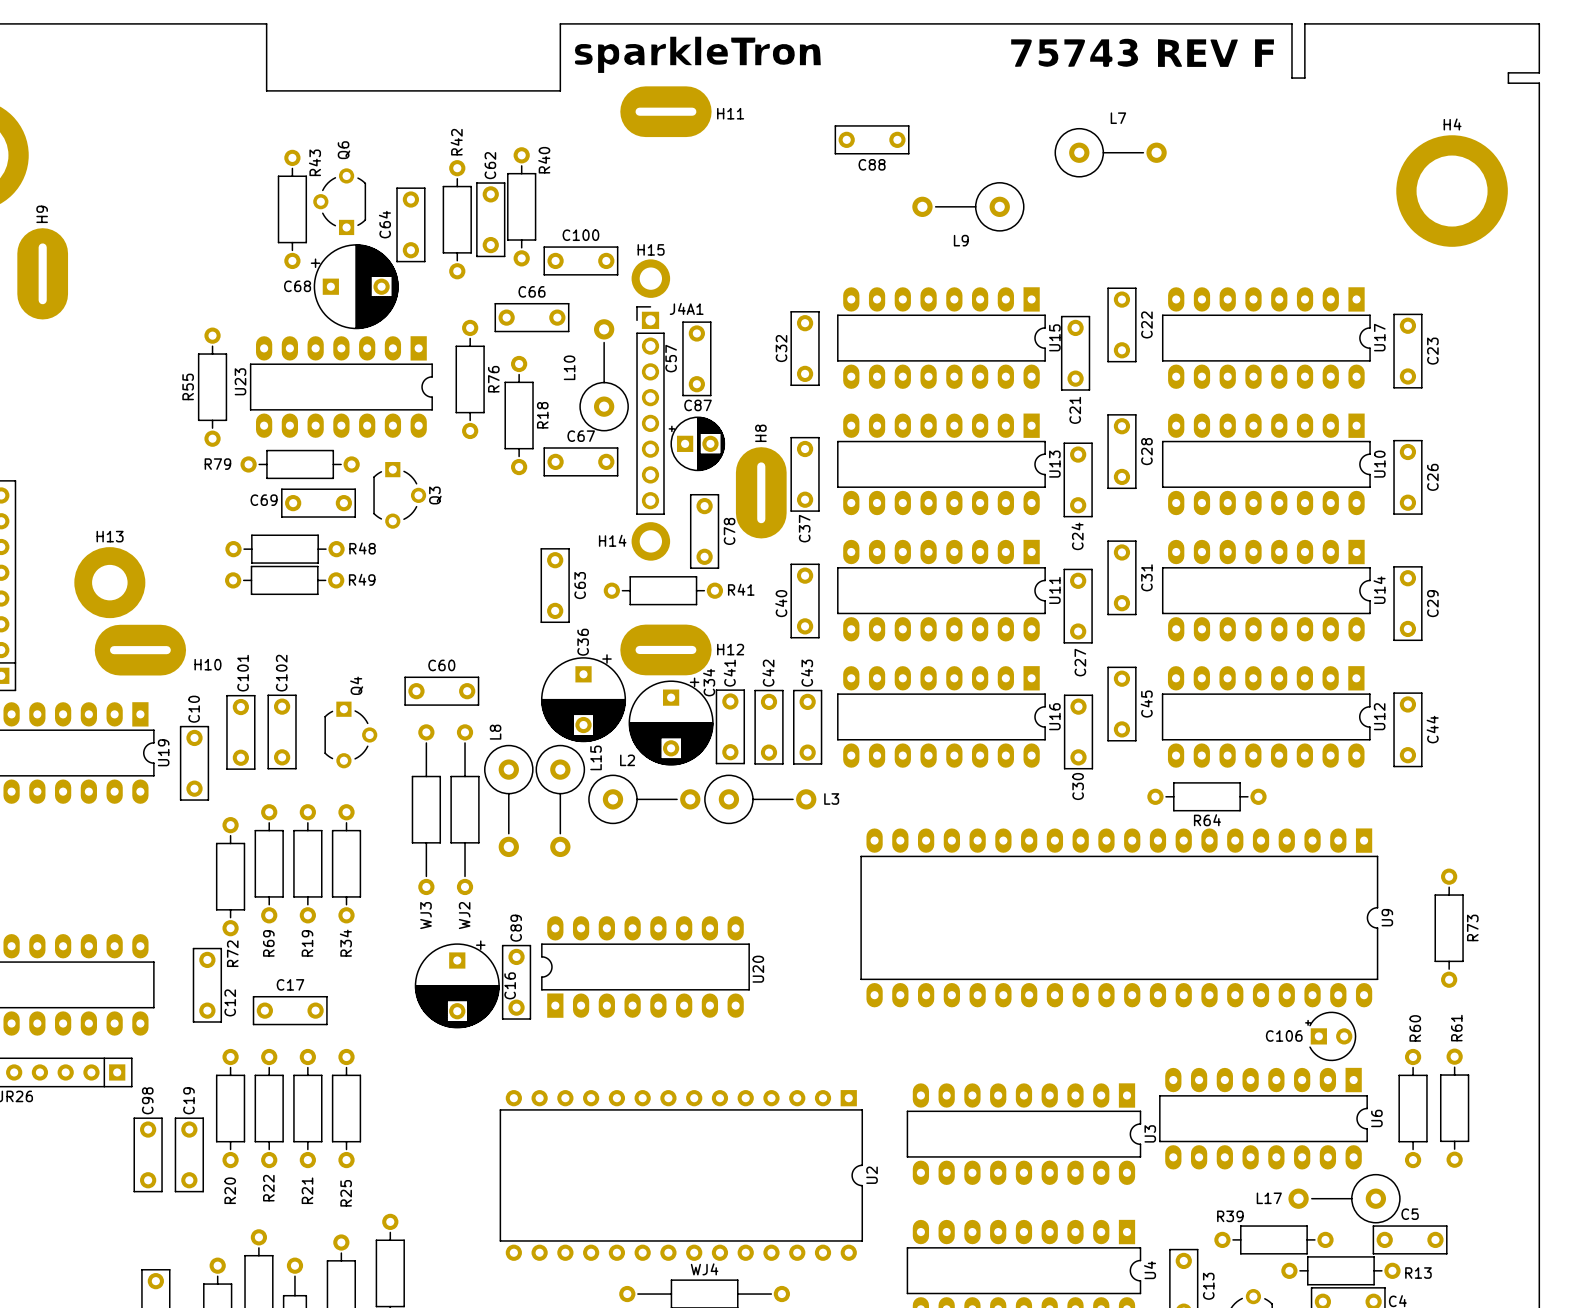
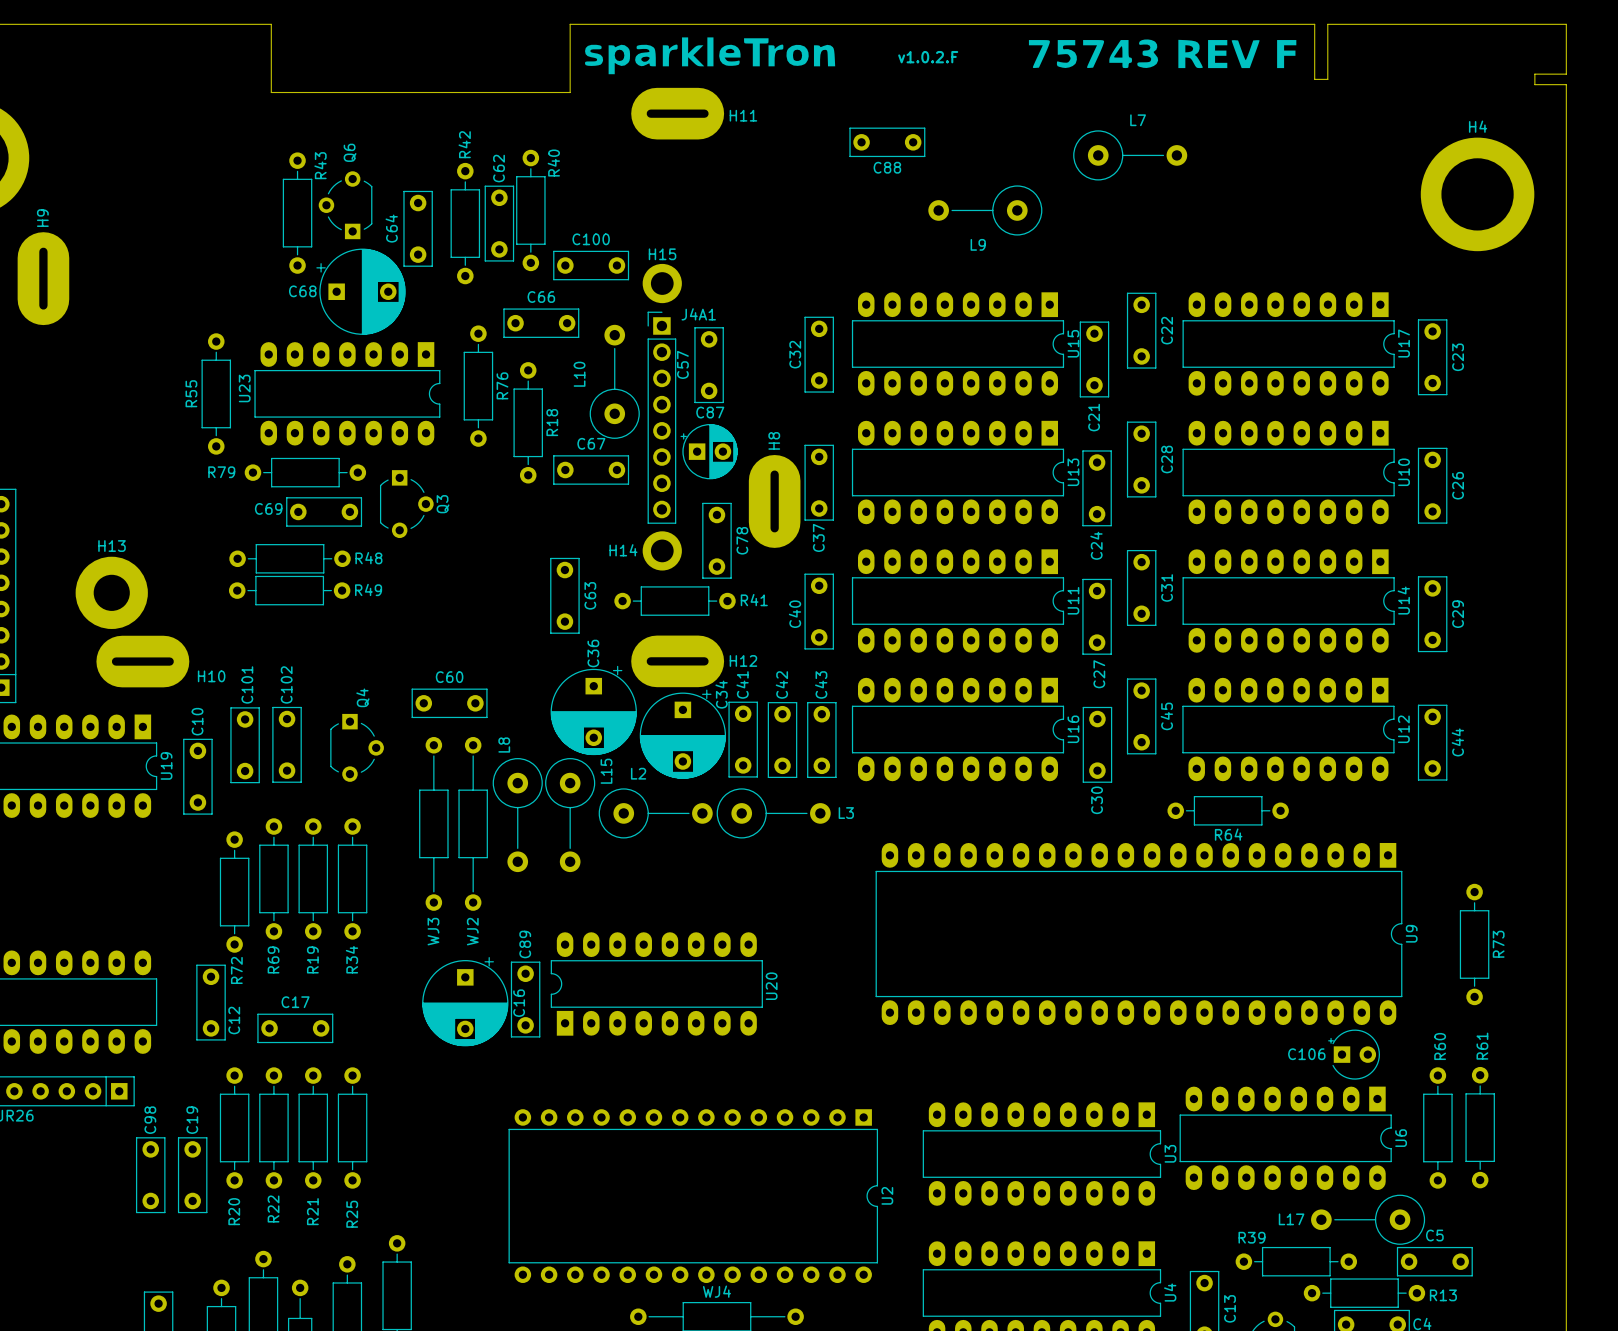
text: none -> v1.0.2.F (928, 57)

